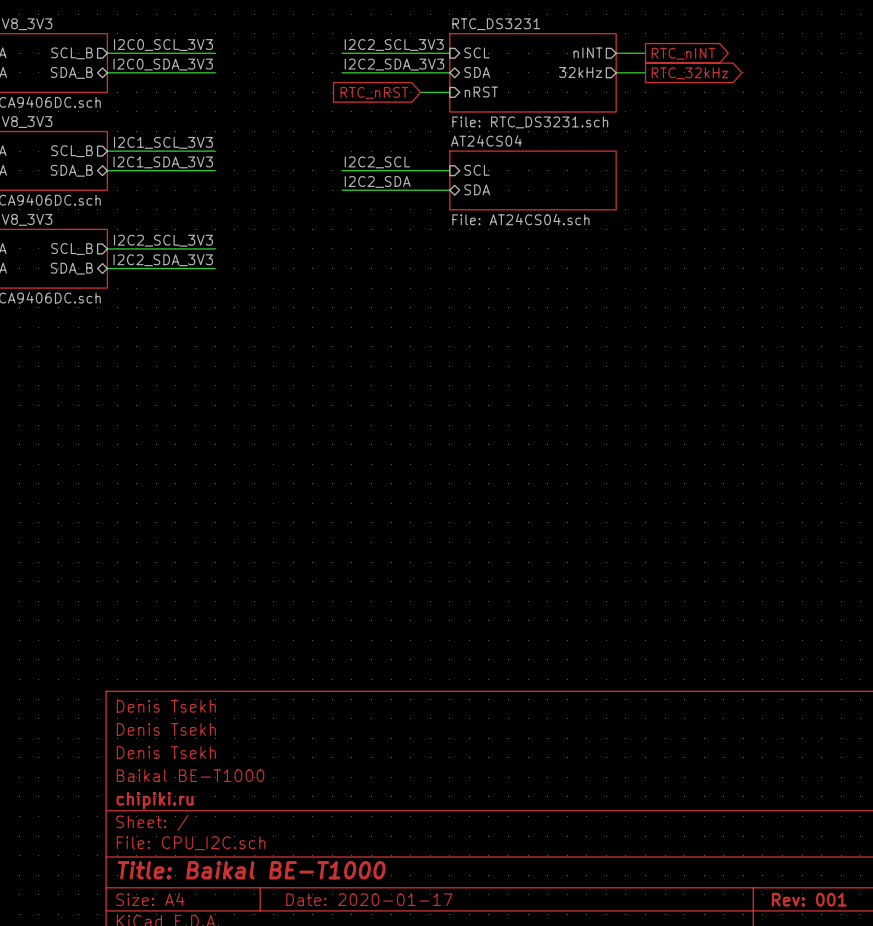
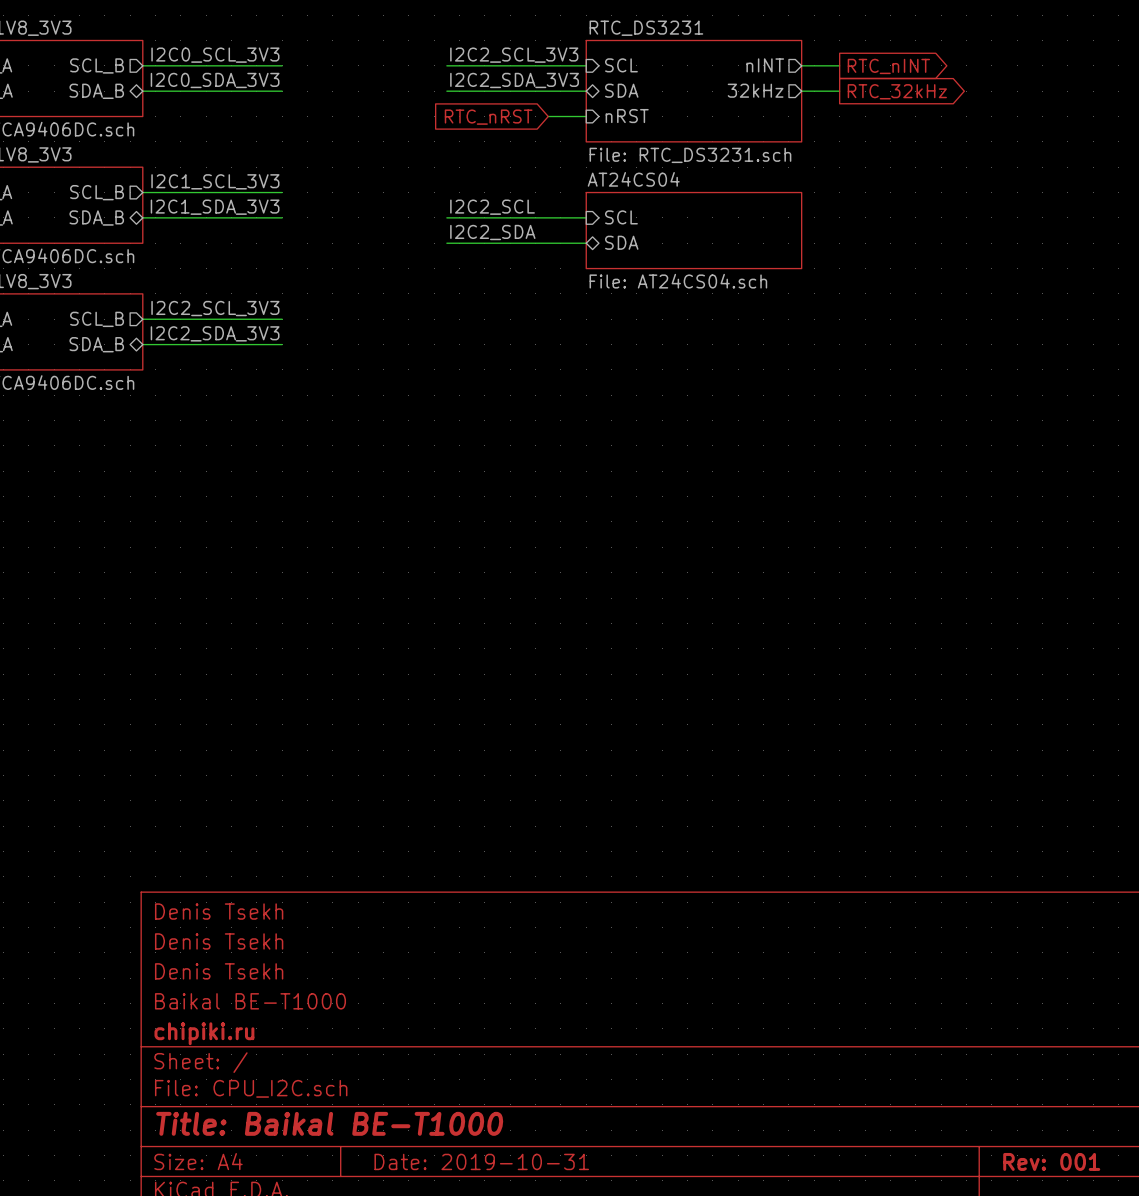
title block: Date: 2020-01-17 (369, 899) -> Date: 2019-10-31 (481, 1161)

